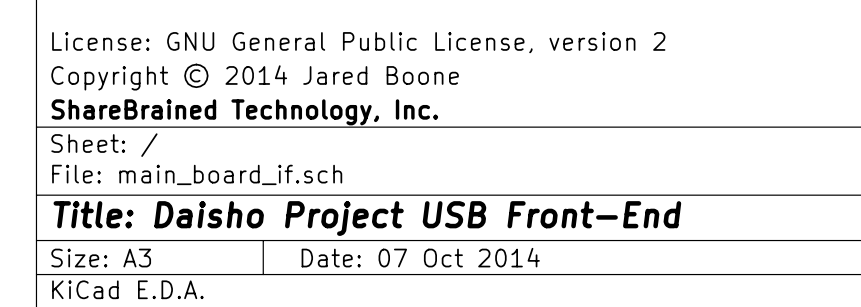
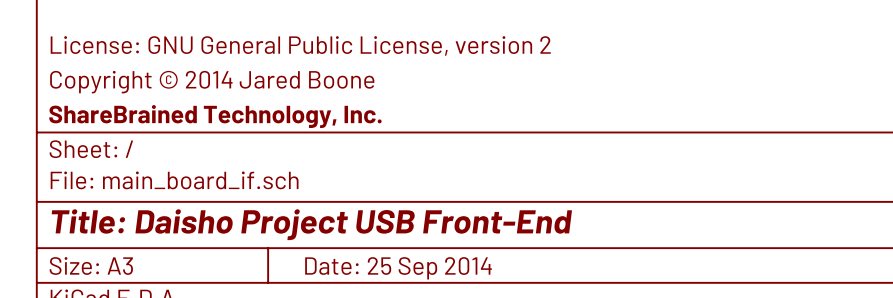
title block: Date: 07 Oct 2014 (420, 257) -> Date: 25 Sep 2014 (398, 268)

